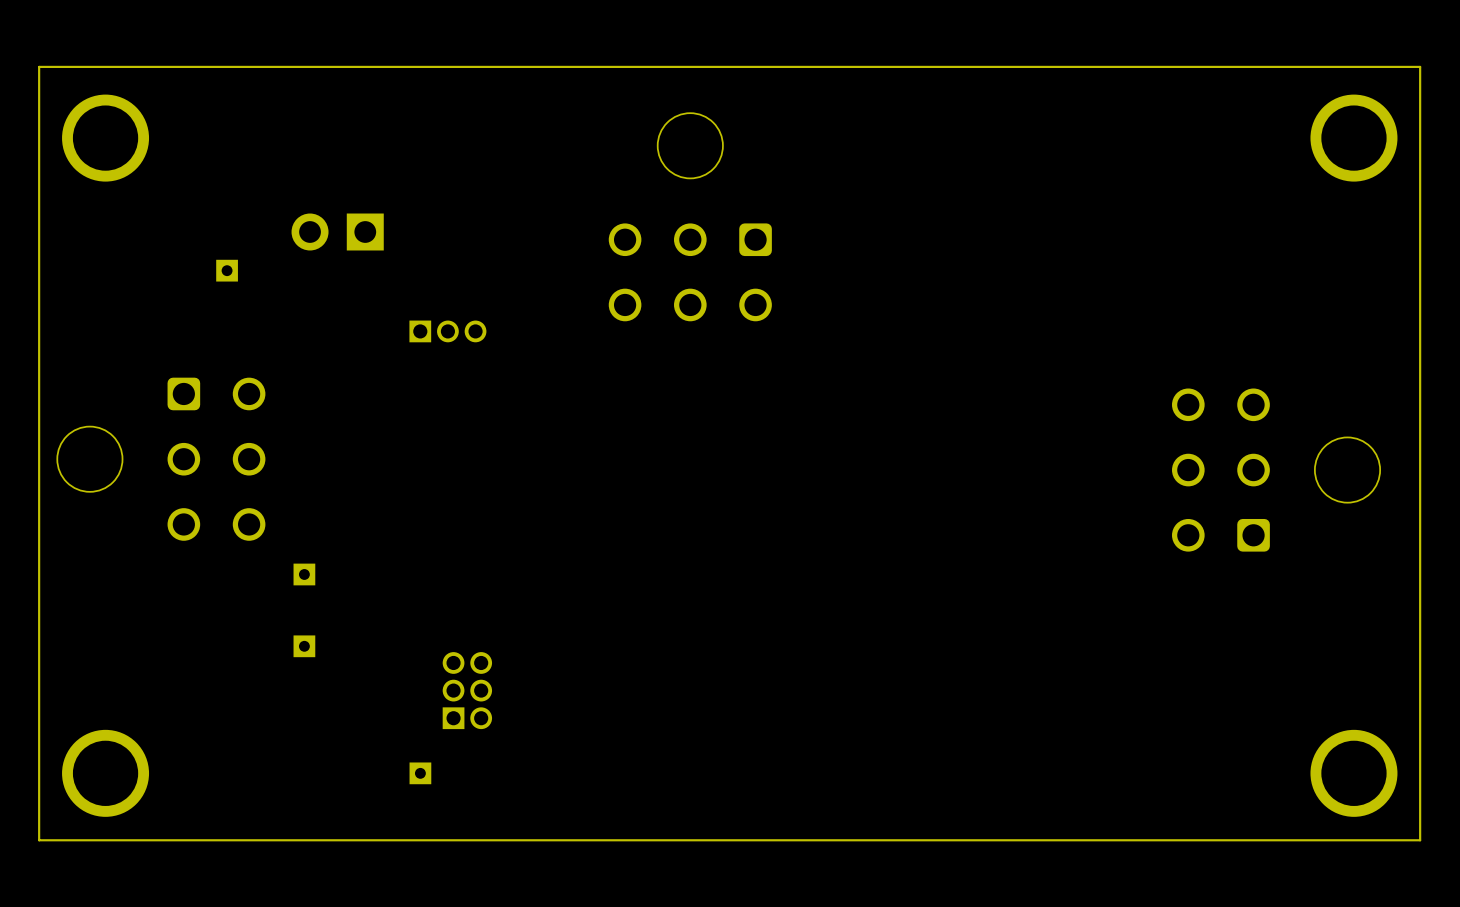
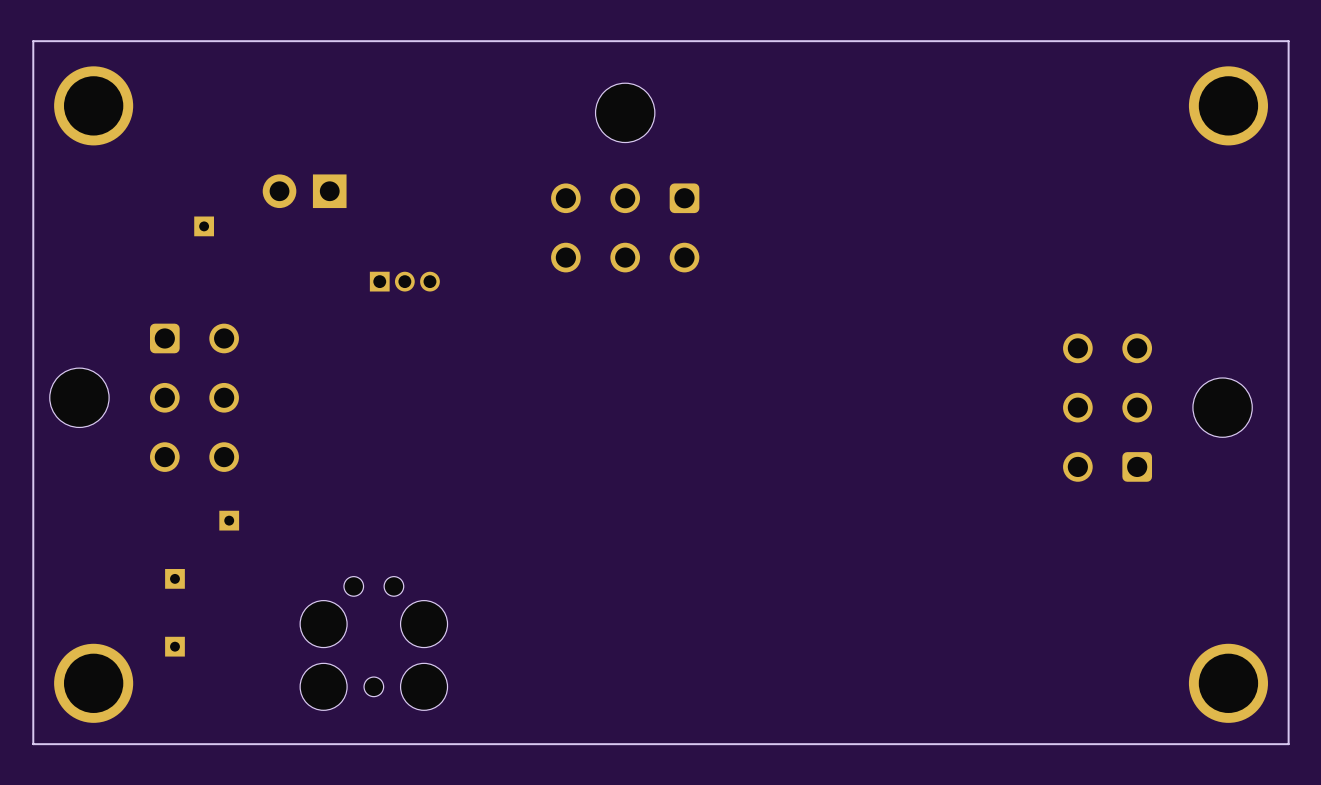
part: (304, 574) -> none
part: none -> (229, 520)
part: (304, 646) -> none
part: none -> (174, 578)
part: (467, 690) -> none
part: none -> (373, 643)
part: none -> (174, 646)
part: (420, 773) -> none

